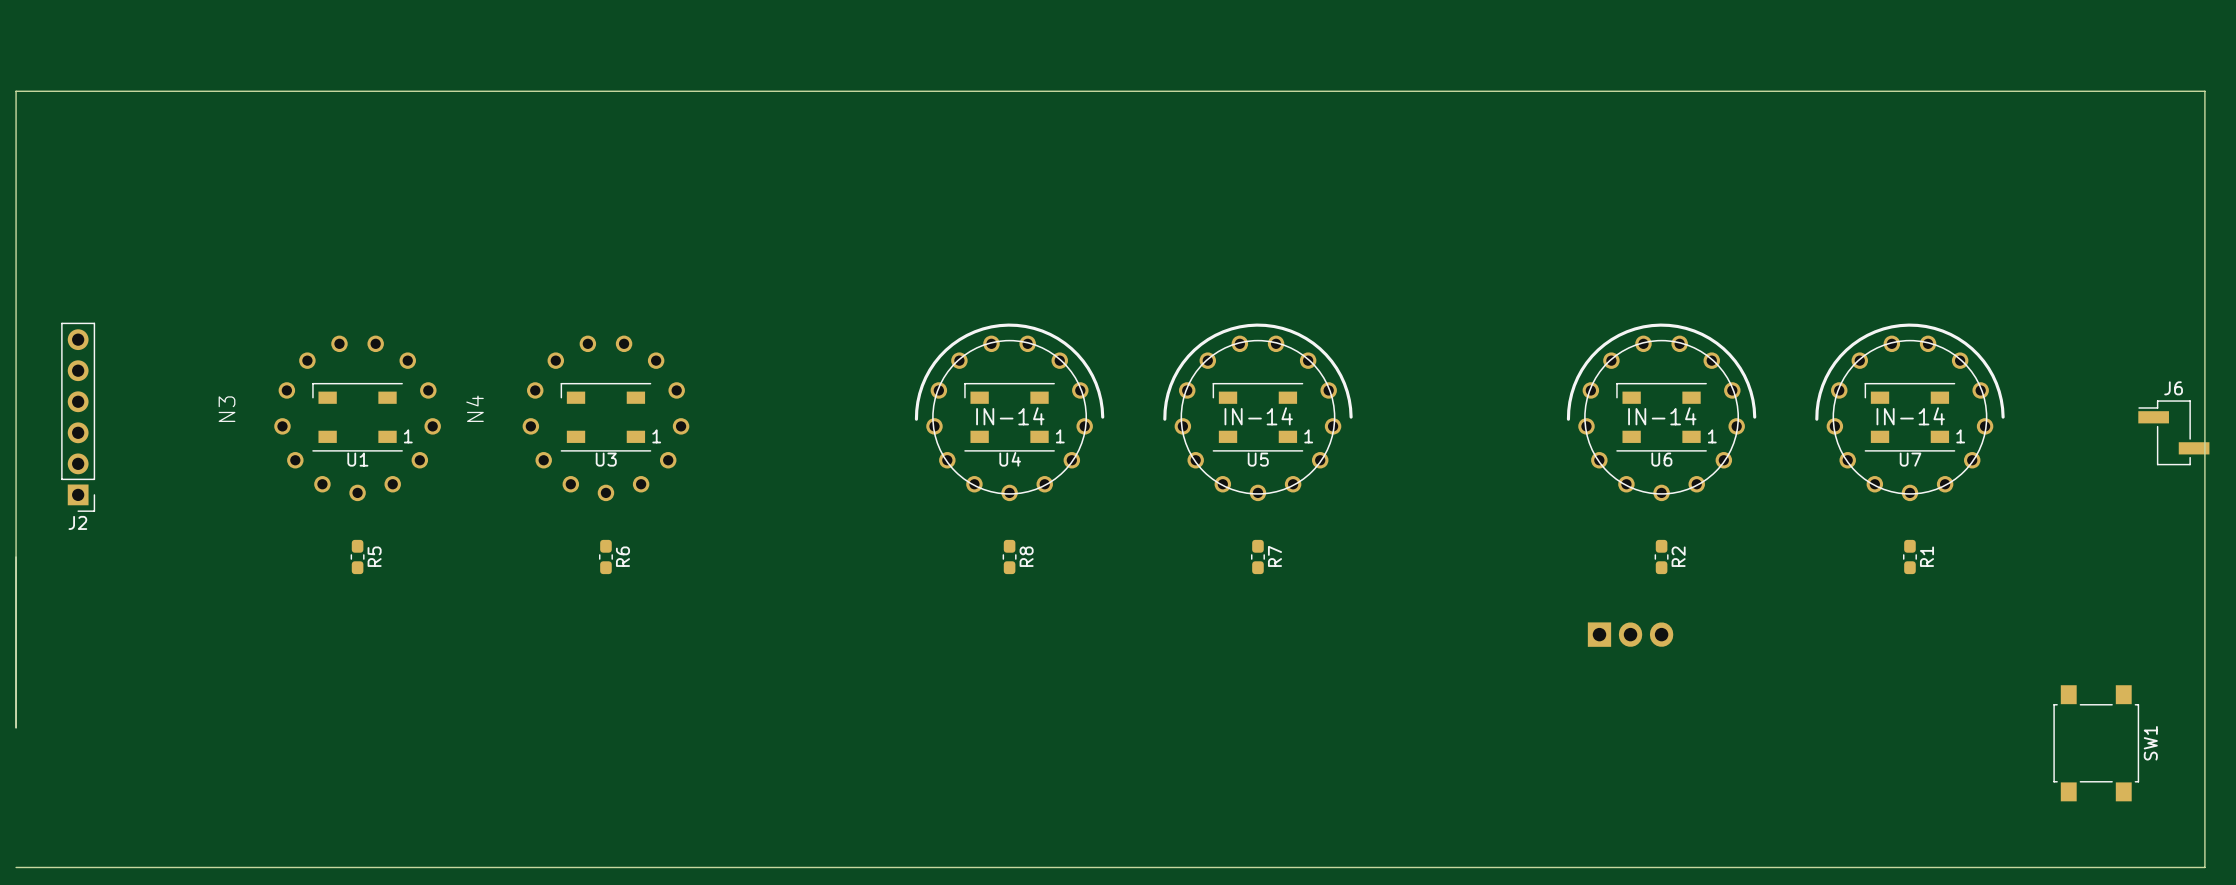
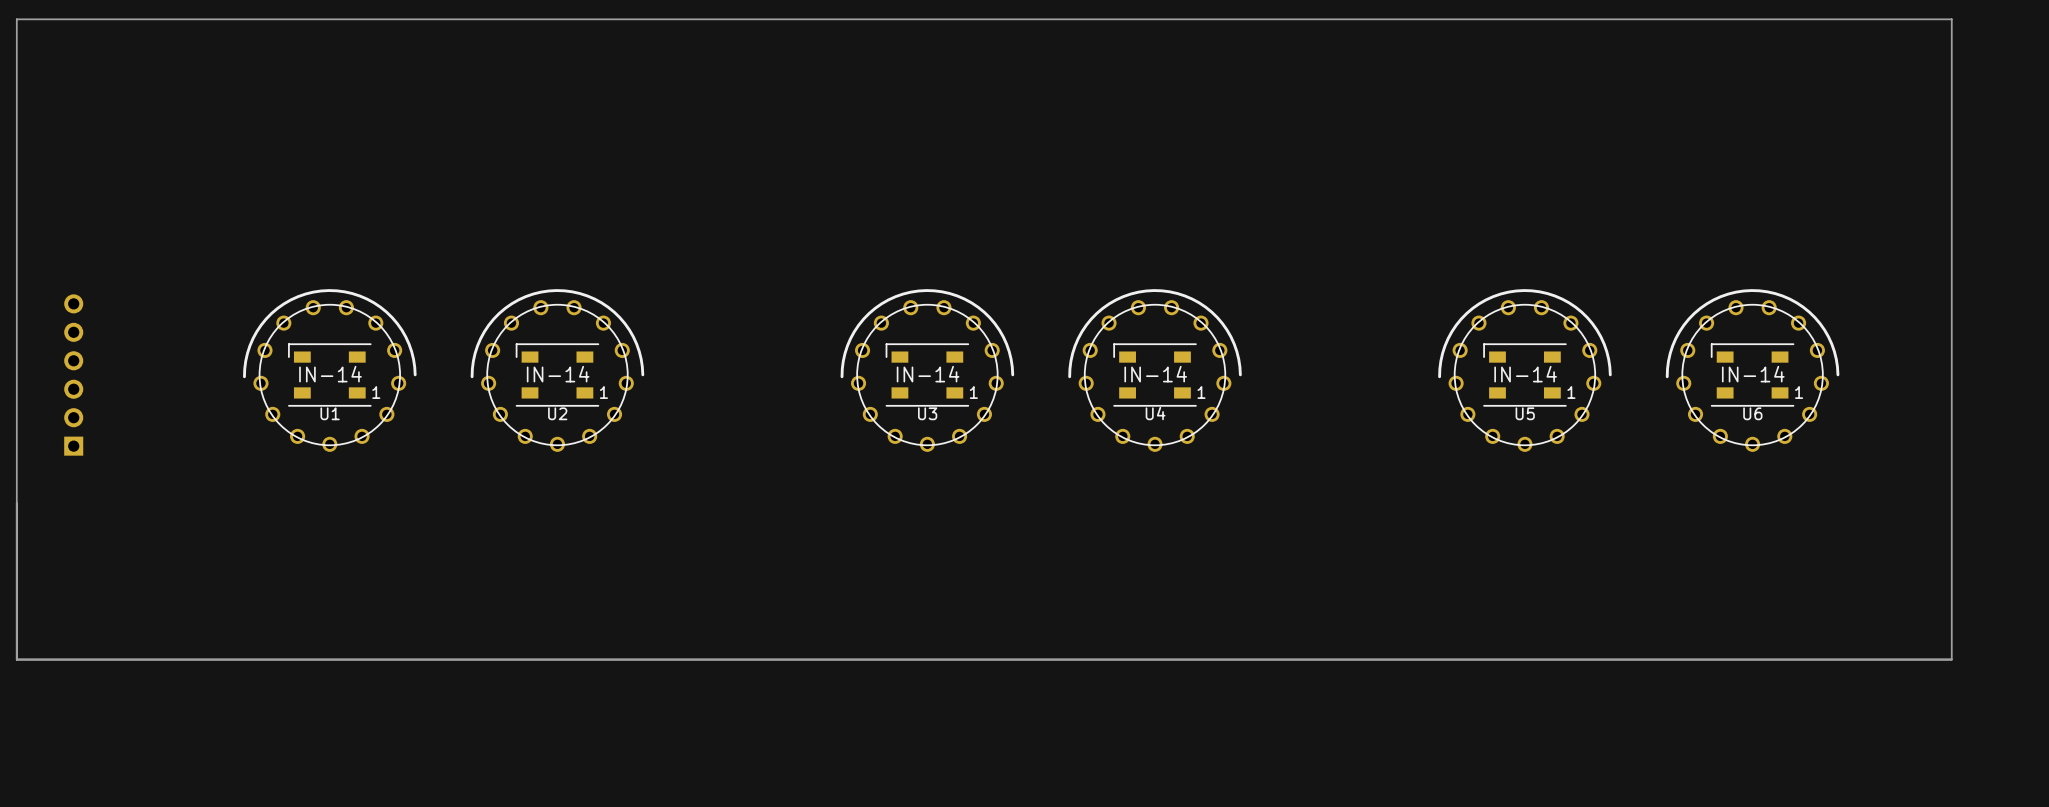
board edge: (16, 91) (2204, 91) (2204, 867) (16, 867) -> (16, 76) (16, 19) (1951, 19) (1951, 659) (16, 659)
part: none -> IN-14 (329, 370)
part: none -> IN-14 (557, 370)
J2: (78, 417) -> none
N3: (357, 418) -> none
N4: (605, 418) -> none
J6: (2173, 432) -> none
U3 name: U3 (606, 459) -> U2 (557, 413)
U4 name: U4 (1010, 459) -> U3 (927, 413)
U5 name: U5 (1258, 459) -> U4 (1155, 413)
U6 name: U6 (1661, 459) -> U5 (1525, 413)
U7 name: U7 (1910, 459) -> U6 (1752, 413)
R5: (357, 556) -> none
R6: (605, 556) -> none
R8: (1009, 556) -> none
R7: (1257, 556) -> none
R2: (1661, 556) -> none
R1: (1909, 556) -> none
part: (1630, 634) -> none
SW1: (2096, 743) -> none

